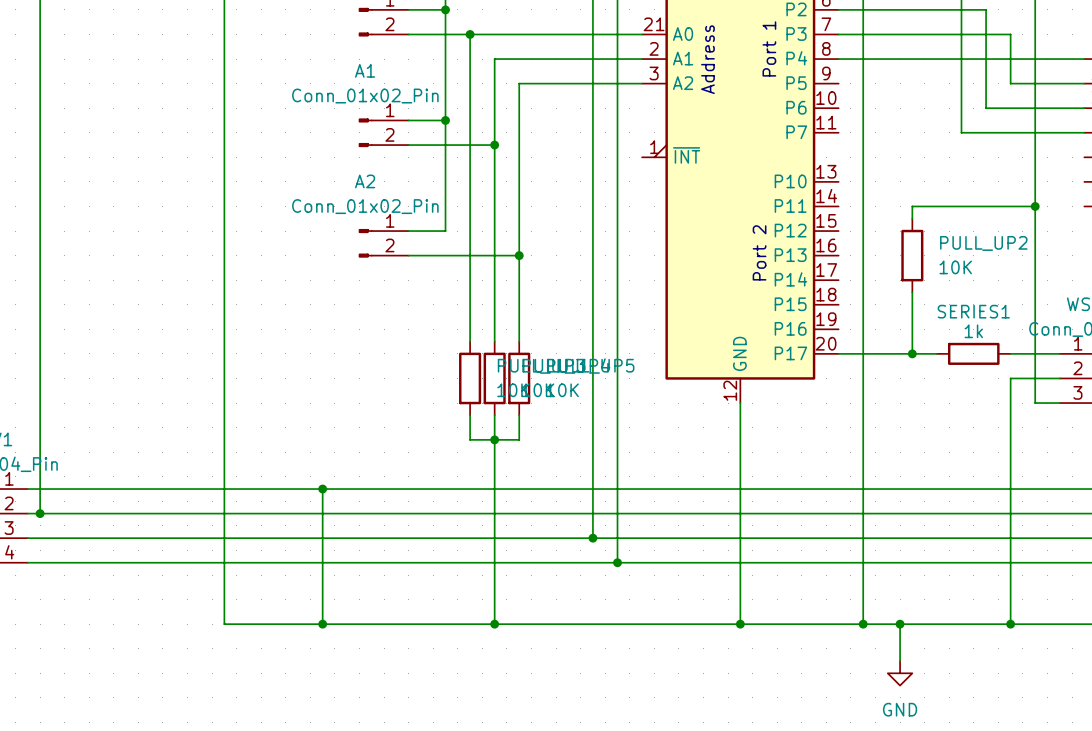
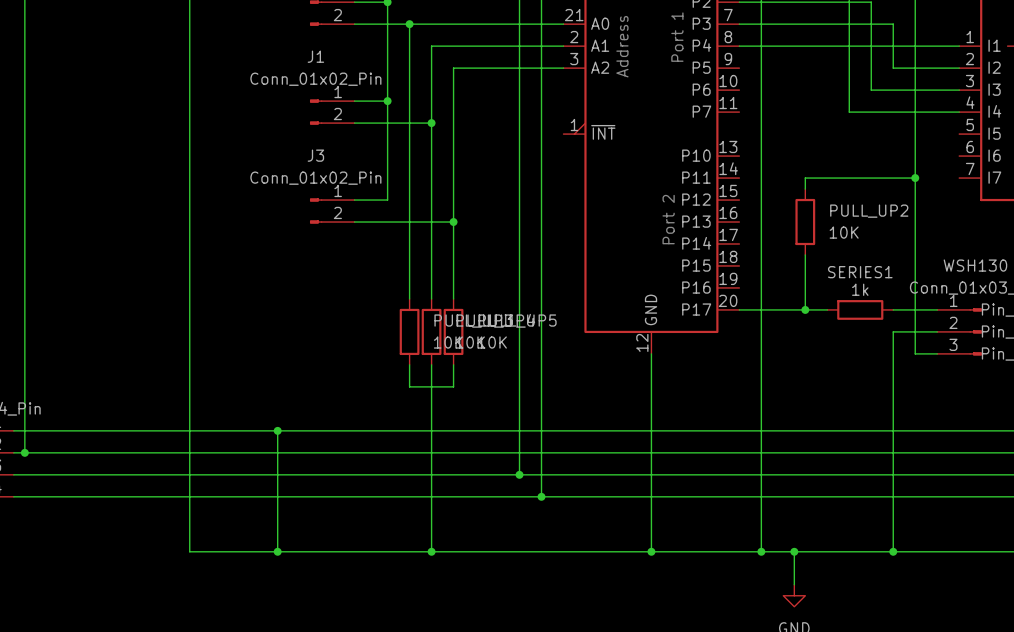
A1 name: A1 (365, 70) -> J1 (315, 56)
A2 name: A2 (365, 181) -> J3 (315, 155)
junction: (494, 439) -> none

